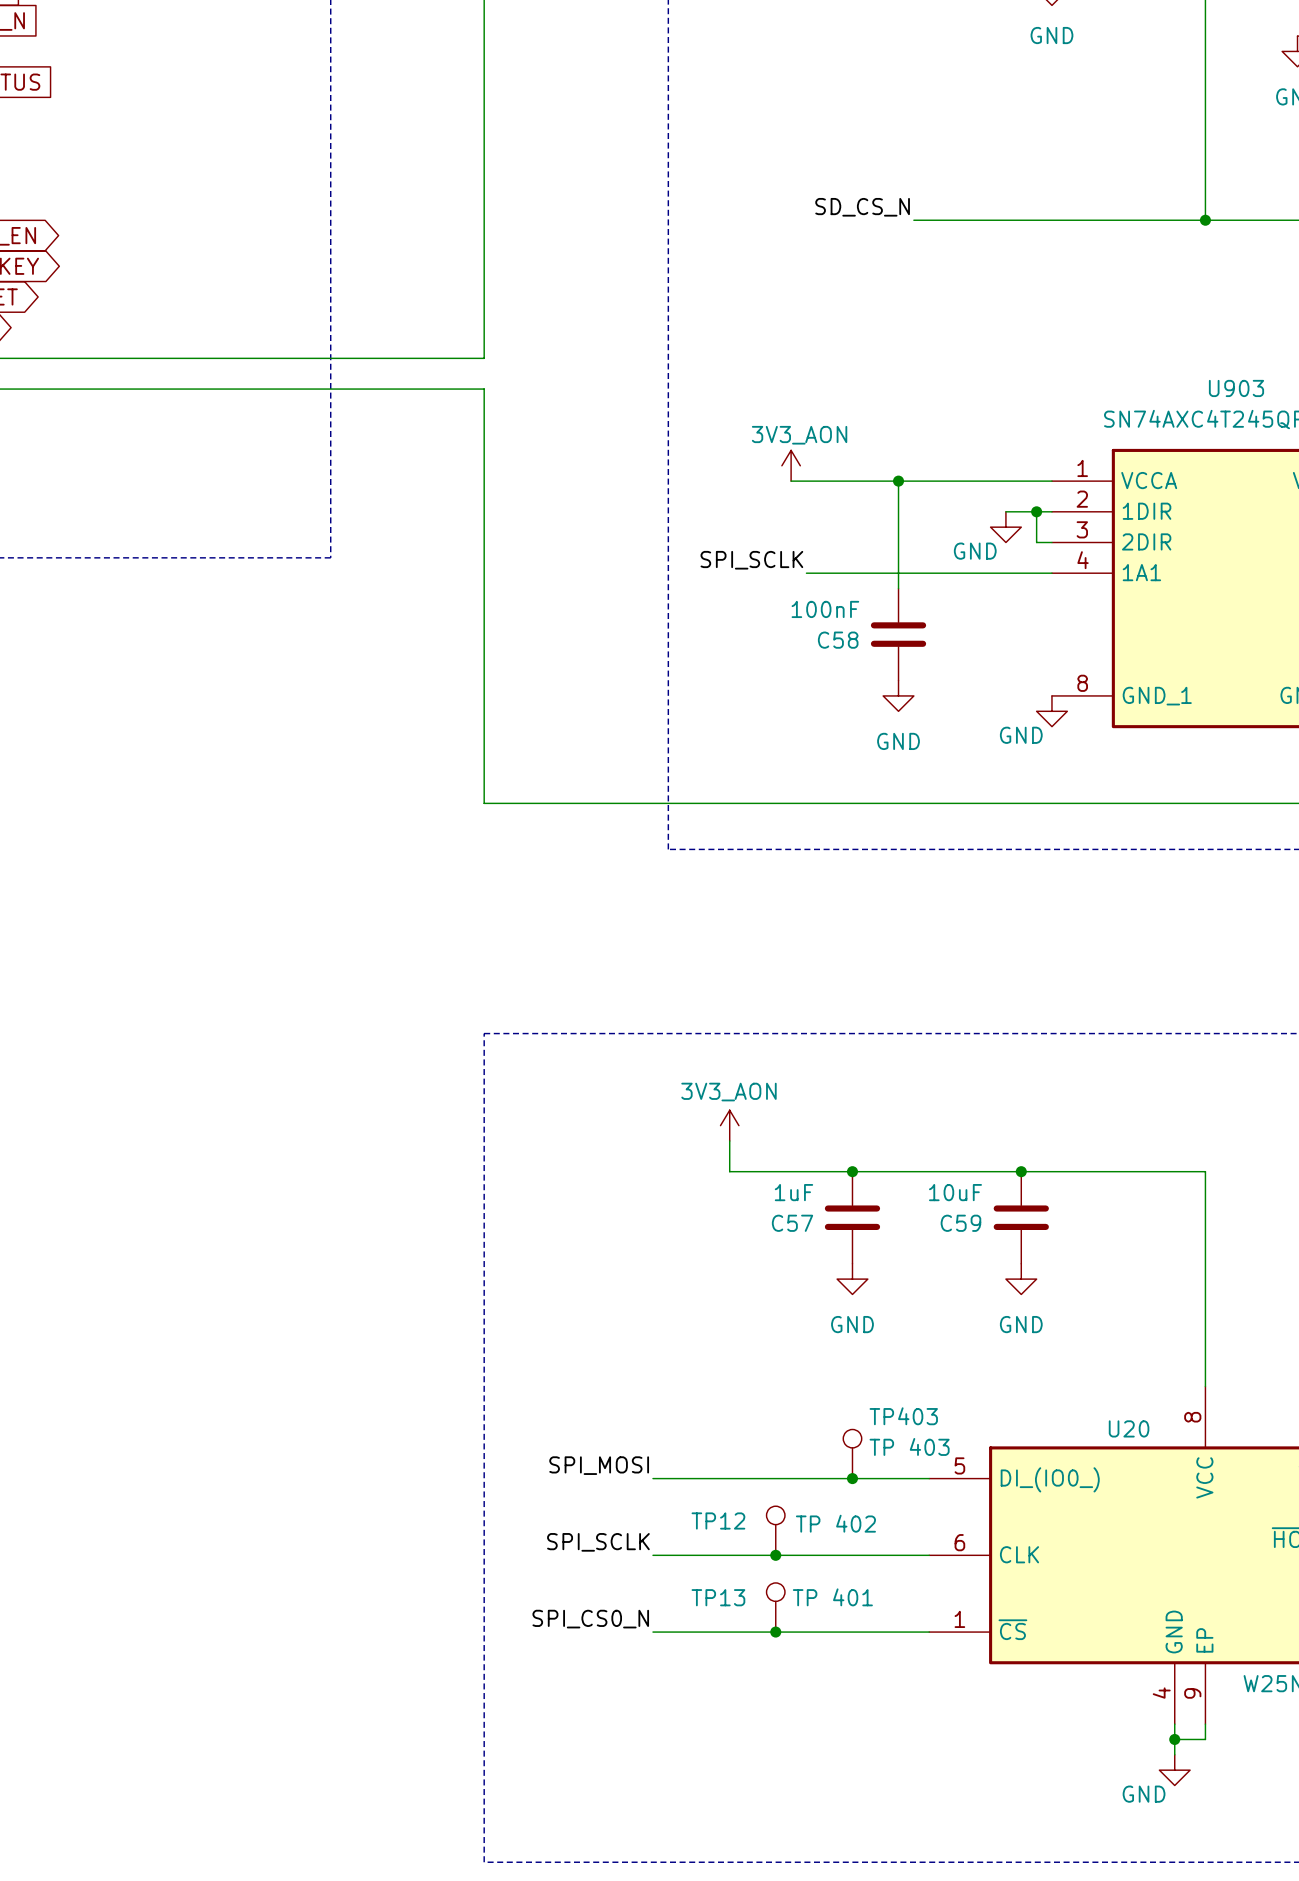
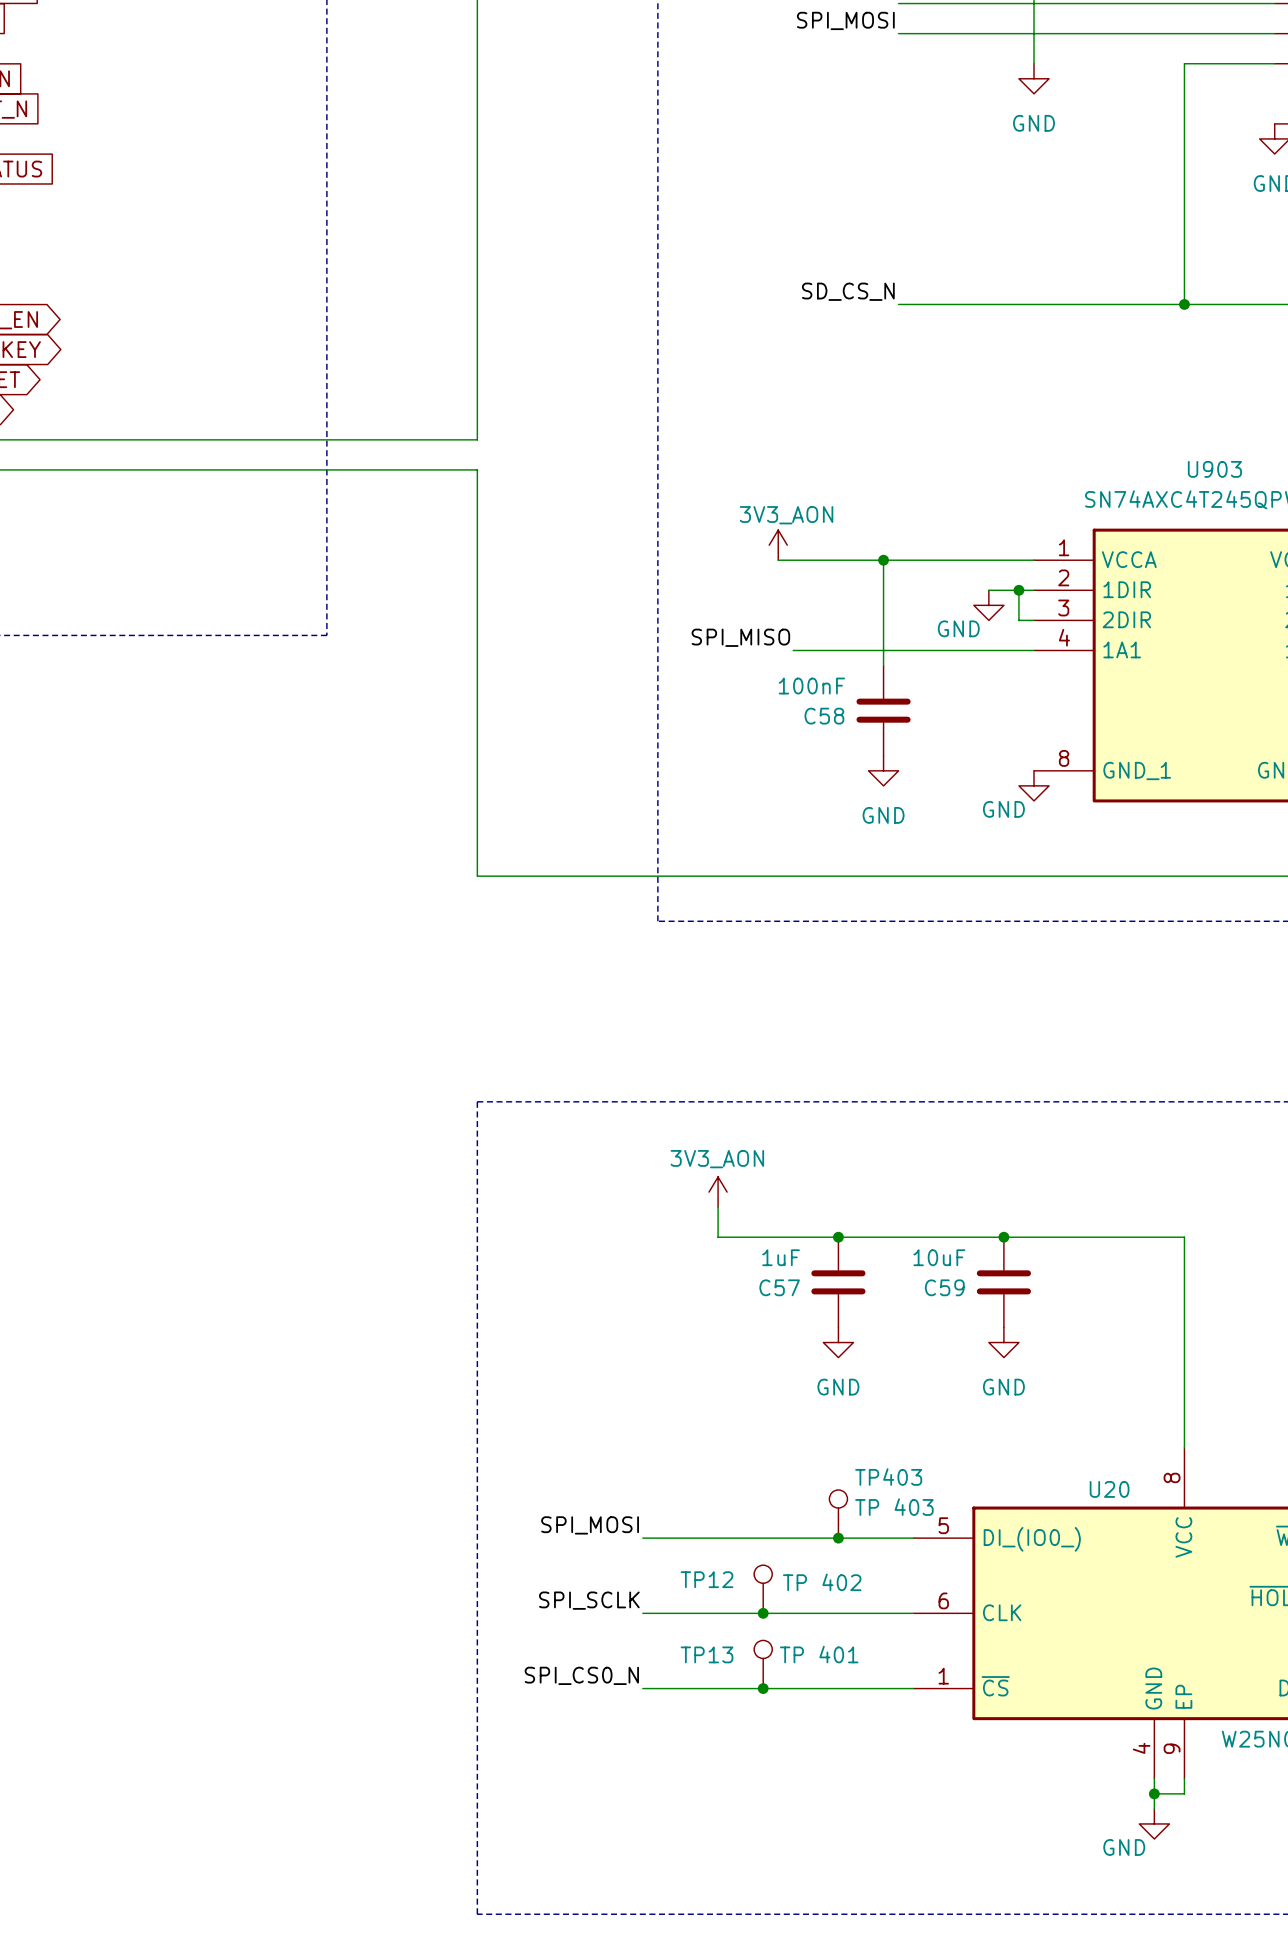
label: SPI_SCLK (751, 560) -> SPI_MISO (740, 637)

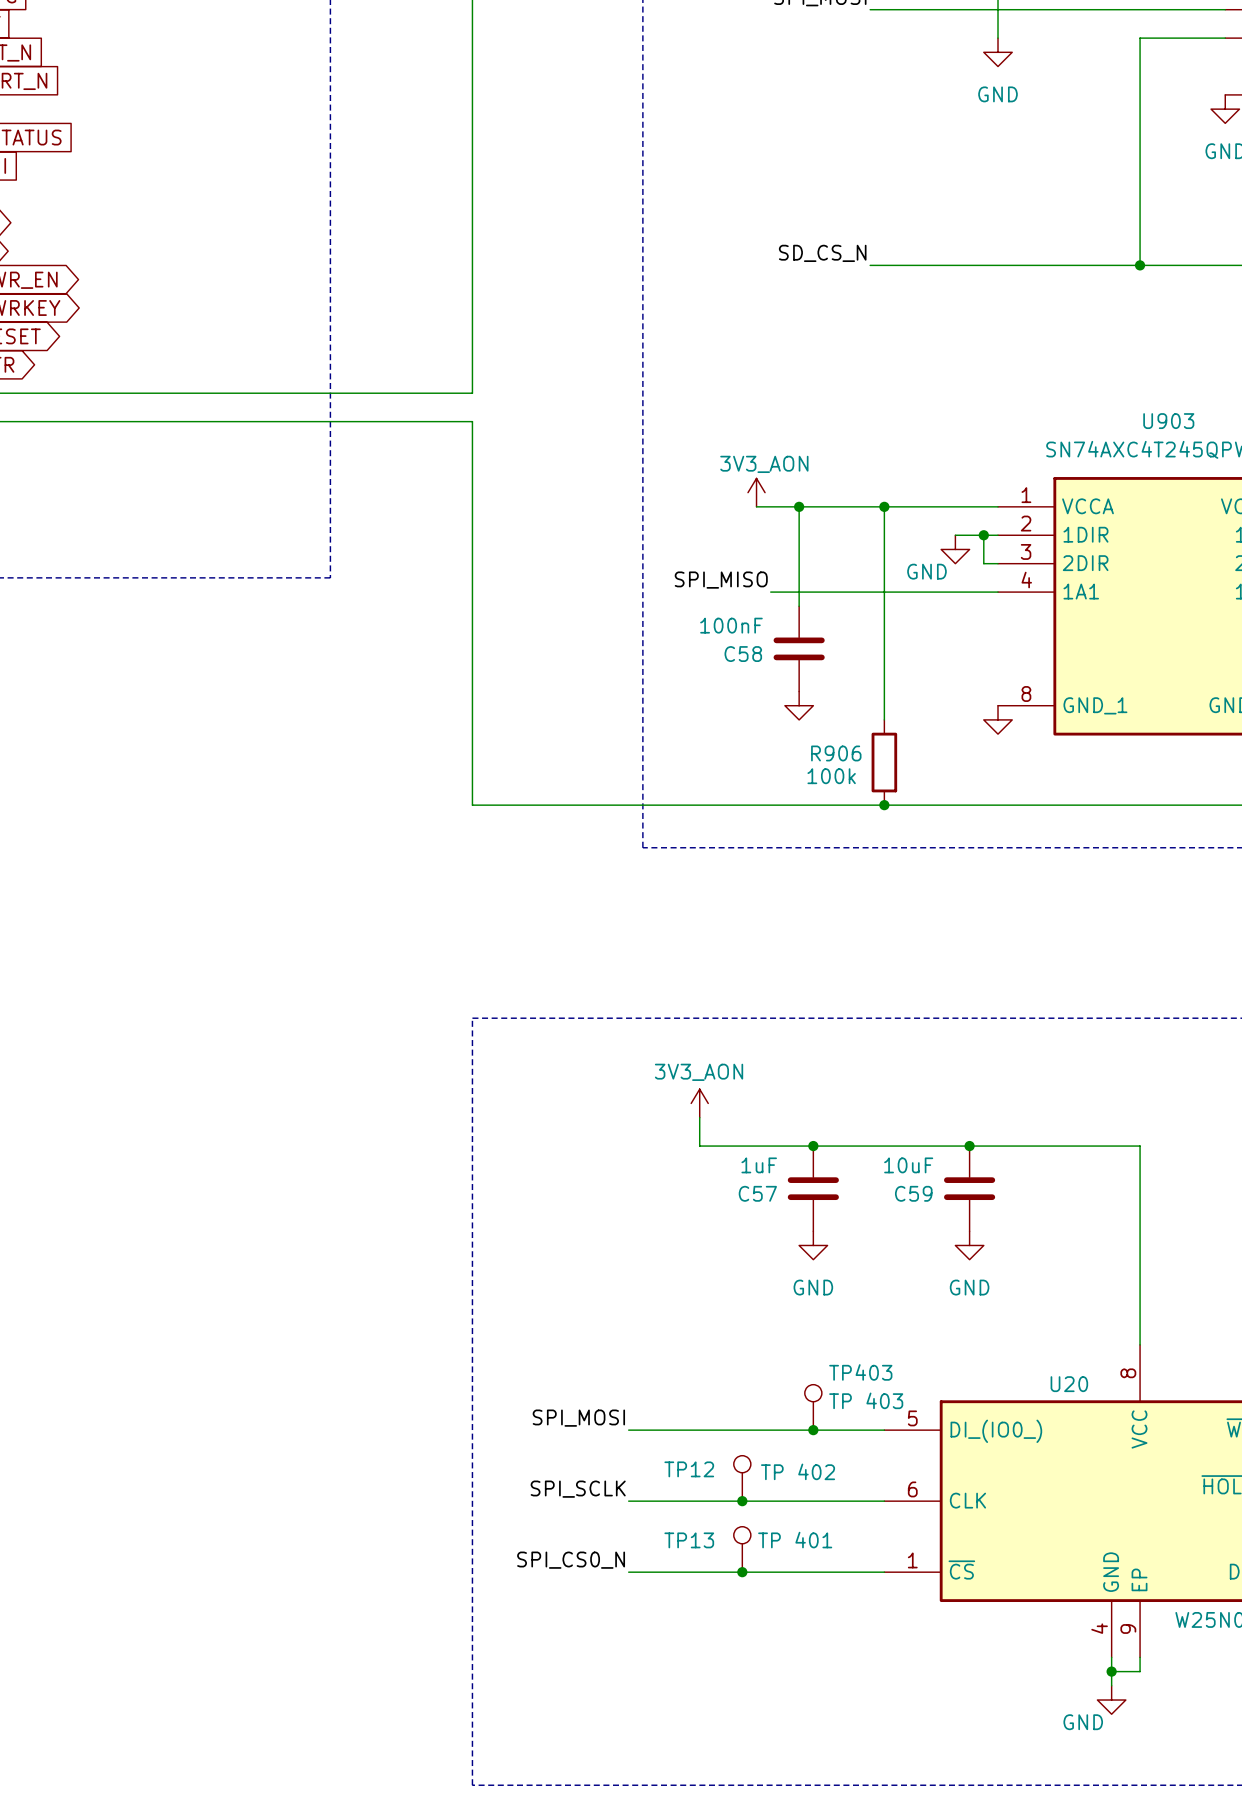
junction: none -> (799, 506)
wire: (883, 560) (883, 665) -> (799, 506) (799, 606)
junction: (883, 560) -> none
wire: none -> (884, 506) (884, 719)
junction: none -> (884, 506)
C58 position: (883, 710) -> (799, 648)
power symbol: none -> (799, 705)
power symbol: GND (883, 770) -> none
power symbol text: GND (1003, 809) -> none
R906: none -> 100k (884, 762)
junction: none -> (884, 805)

